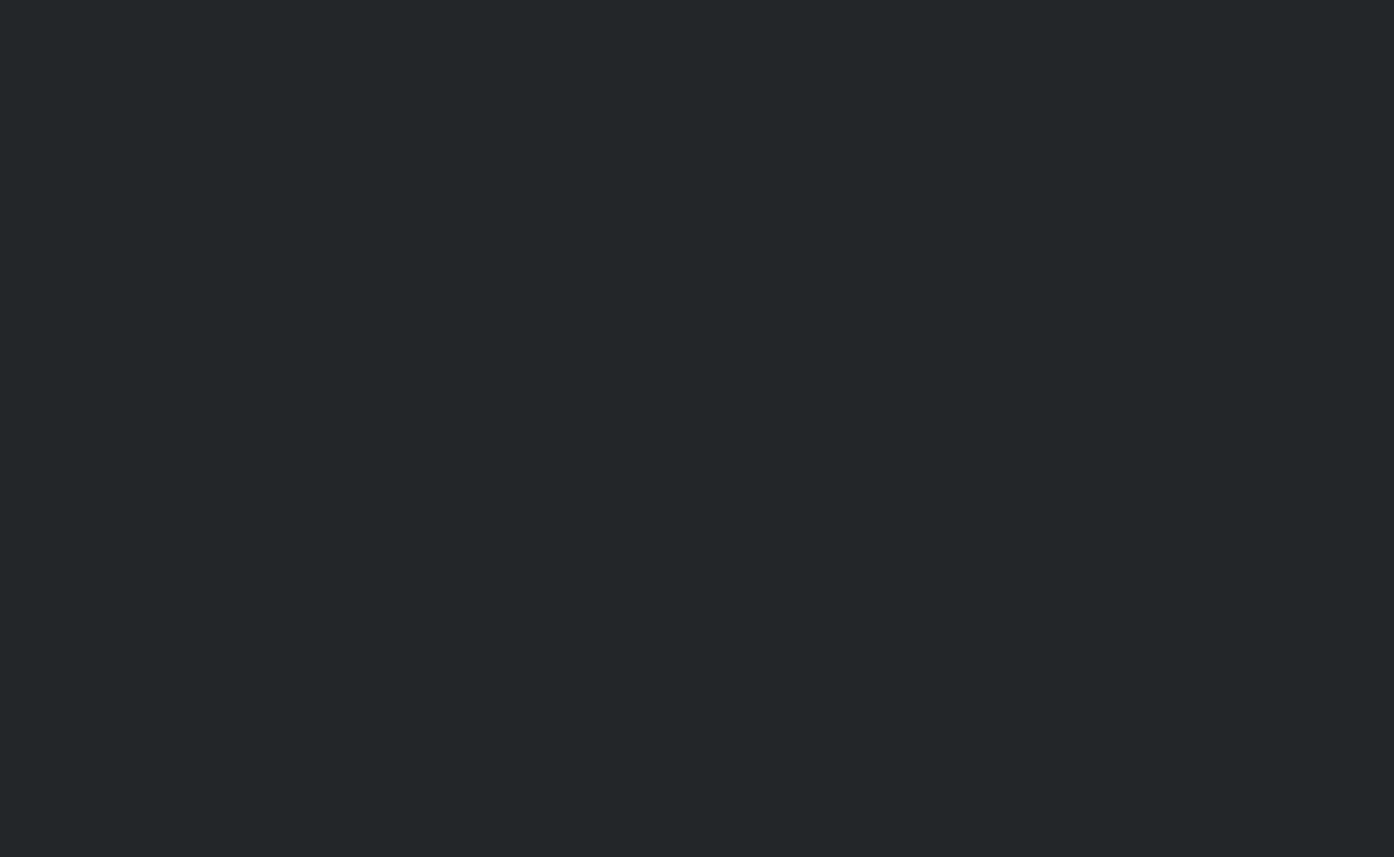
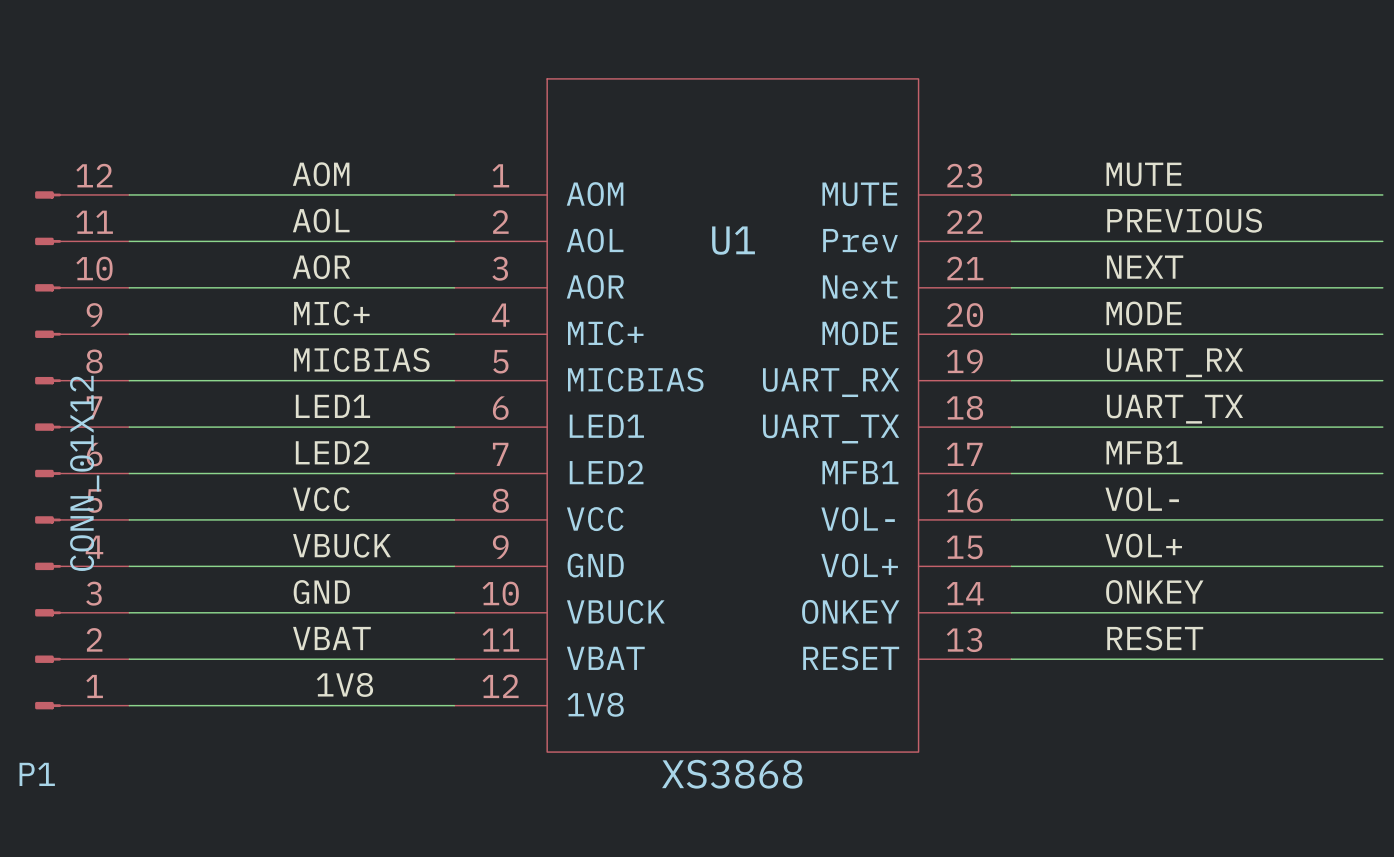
label: none -> AOM (321, 174)
label: none -> MUTE (1143, 174)
wire: none -> (129, 194) (454, 194)
wire: none -> (1011, 194) (1382, 194)
label: none -> AOL (321, 220)
label: none -> PREVIOUS (1184, 220)
wire: none -> (129, 241) (454, 241)
wire: none -> (1011, 241) (1382, 241)
label: none -> AOR (321, 267)
label: none -> NEXT (1145, 267)
wire: none -> (129, 287) (454, 287)
wire: none -> (1011, 287) (1382, 287)
label: none -> MIC+ (331, 313)
label: none -> MODE (1143, 313)
wire: none -> (129, 334) (454, 334)
wire: none -> (1011, 334) (1382, 334)
label: none -> MICBIAS (361, 359)
label: none -> UART_RX (1175, 362)
wire: none -> (129, 380) (454, 380)
wire: none -> (1011, 380) (1382, 380)
label: none -> LED1 (332, 406)
label: none -> UART_TX (1175, 409)
U1: none -> XS3868 (732, 415)
wire: none -> (129, 427) (454, 427)
wire: none -> (1011, 427) (1382, 427)
P1: none -> CONN_01X12 (82, 450)
label: none -> LED2 (332, 452)
label: none -> MFB1 (1144, 452)
wire: none -> (129, 473) (454, 473)
wire: none -> (1011, 473) (1382, 473)
label: none -> VCC (321, 499)
label: none -> VOL- (1142, 499)
wire: none -> (129, 519) (454, 519)
wire: none -> (1011, 519) (1382, 519)
label: none -> VBUCK (341, 545)
label: none -> VOL+ (1143, 545)
wire: none -> (129, 566) (454, 566)
wire: none -> (1011, 566) (1382, 566)
label: none -> GND (321, 592)
label: none -> ONKEY (1154, 592)
wire: none -> (129, 612) (454, 612)
wire: none -> (1011, 612) (1382, 612)
label: none -> VBAT (331, 638)
label: none -> RESET (1155, 638)
wire: none -> (129, 659) (454, 659)
wire: none -> (1011, 659) (1382, 659)
label: none -> 1V8 (344, 684)
wire: none -> (129, 705) (454, 705)

